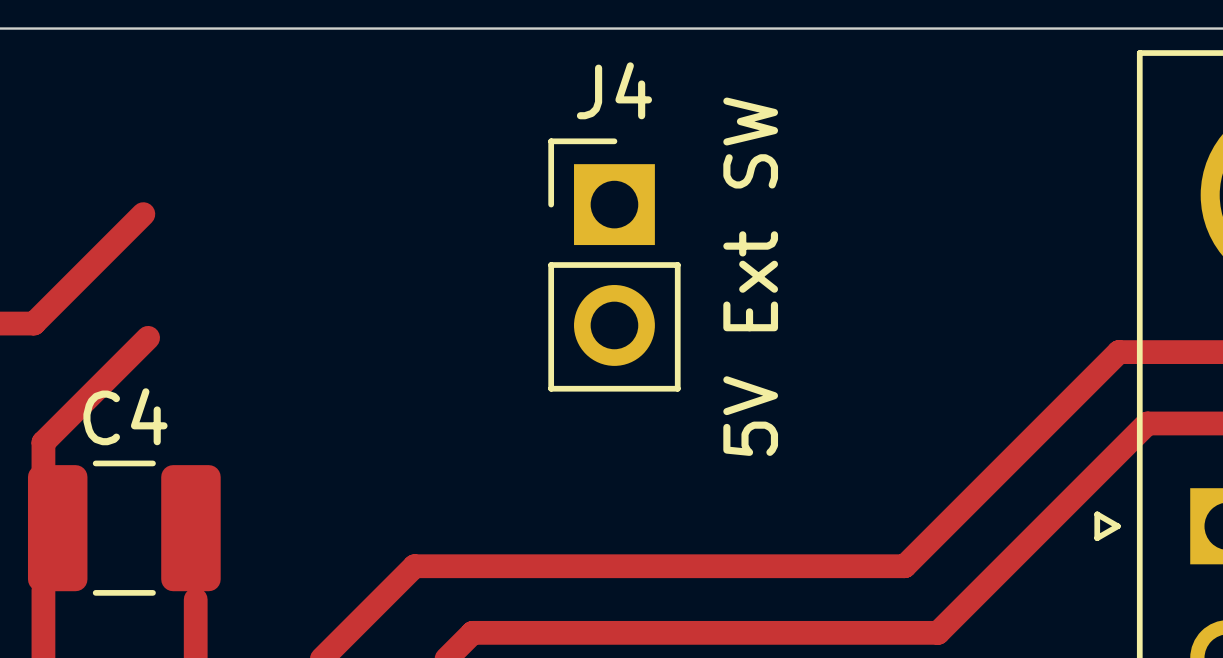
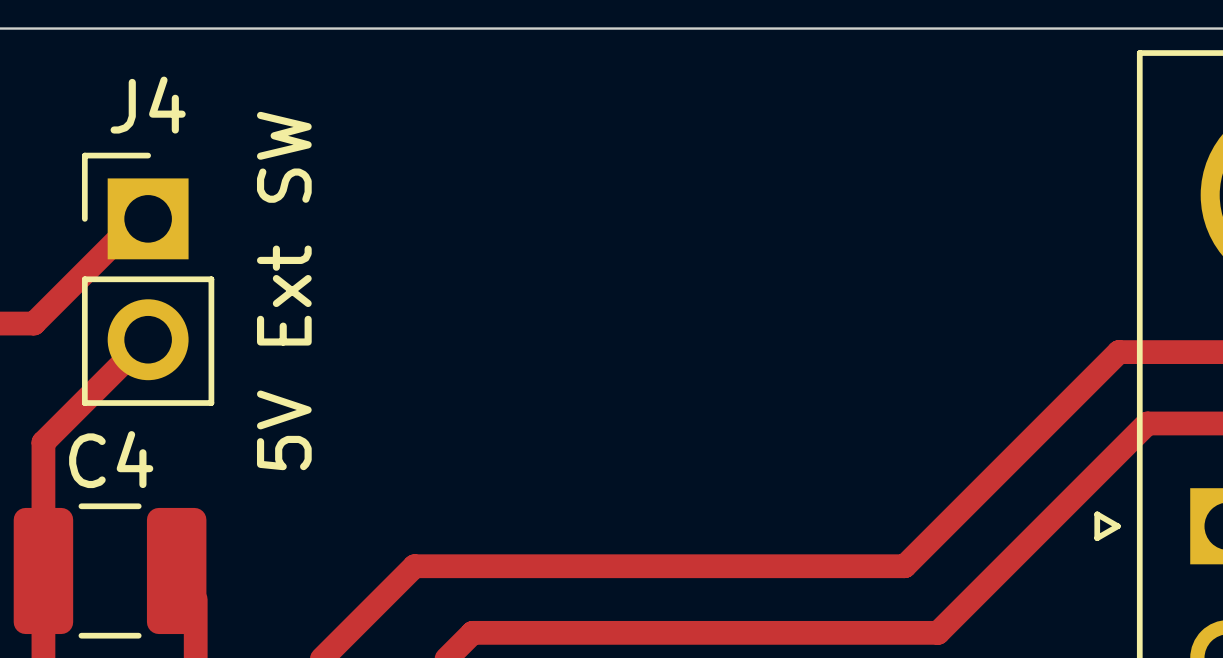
J4 position: (614, 265) -> (148, 279)
C4 position: (124, 528) -> (110, 570)

